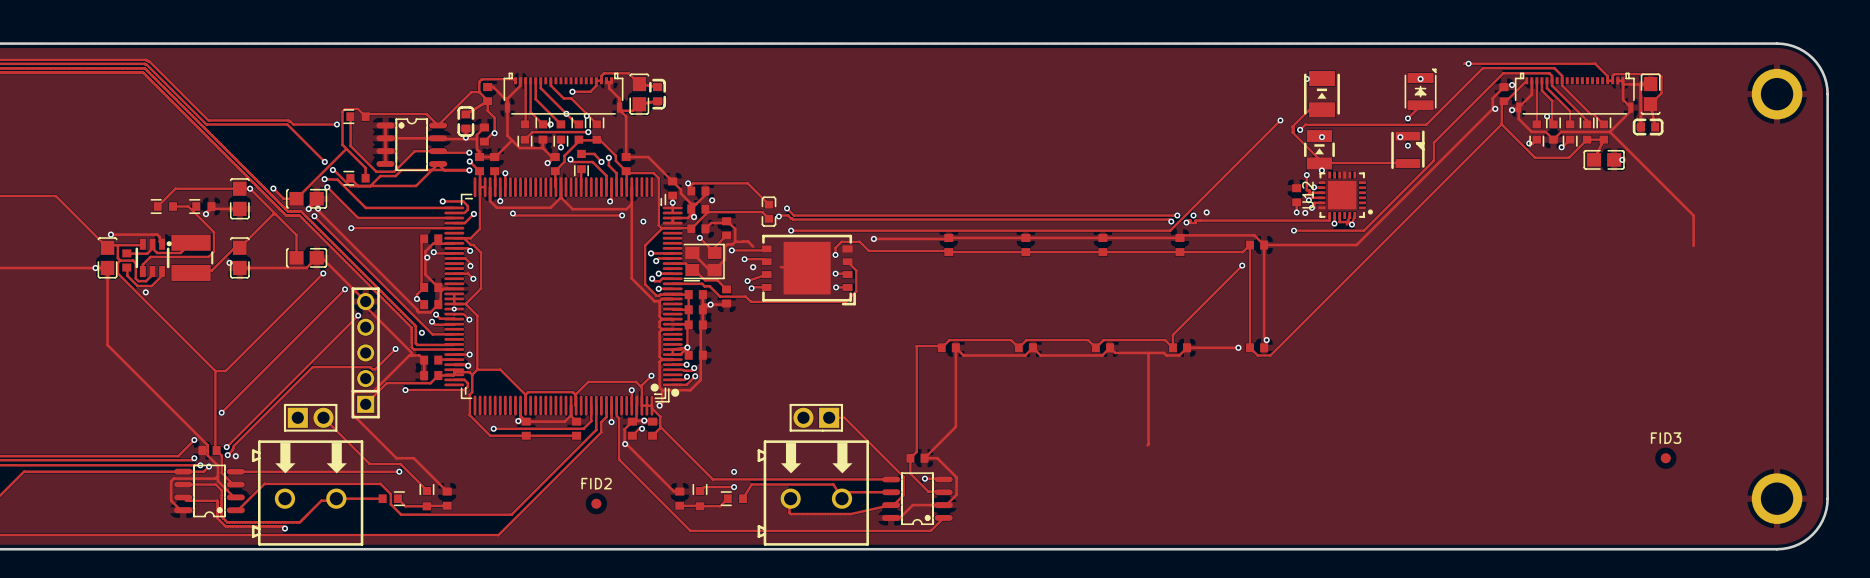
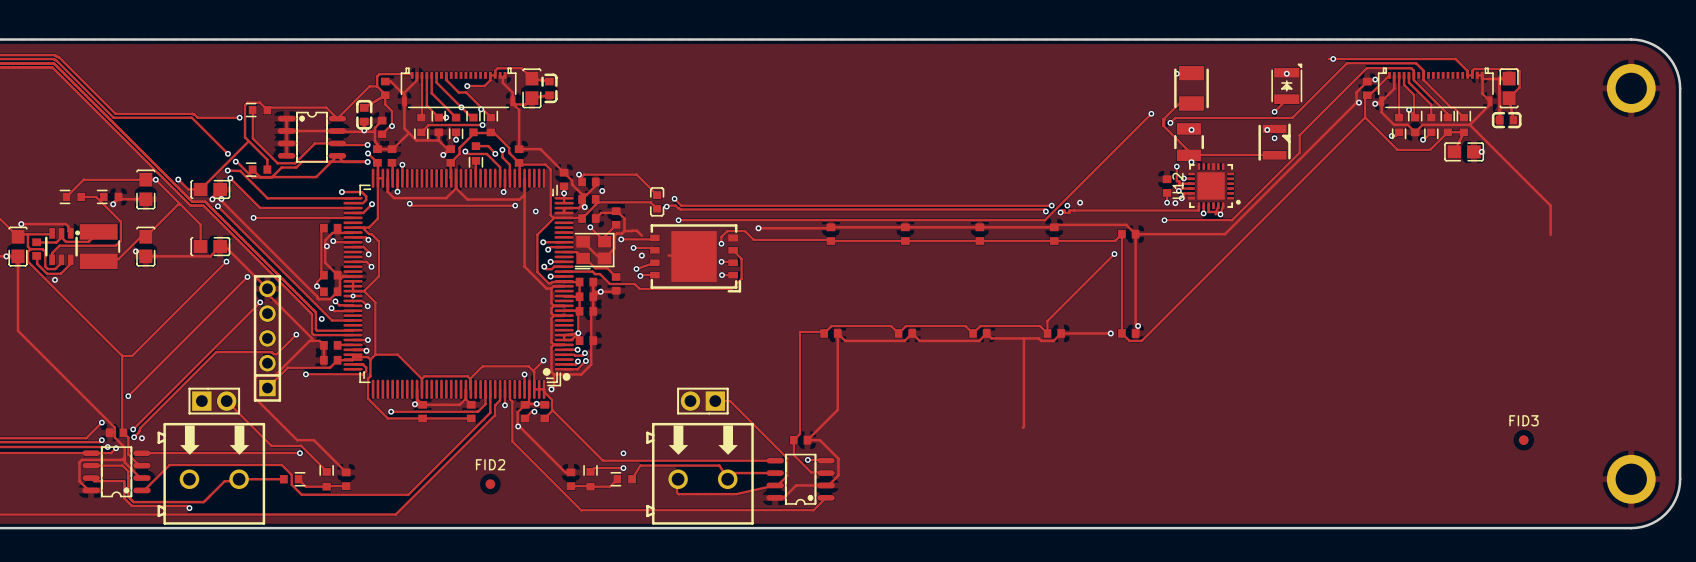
part footprint: [1303, 70, 1340, 118] -> [1174, 65, 1209, 111]
part footprint: [1304, 130, 1335, 170] -> [1174, 123, 1204, 162]

